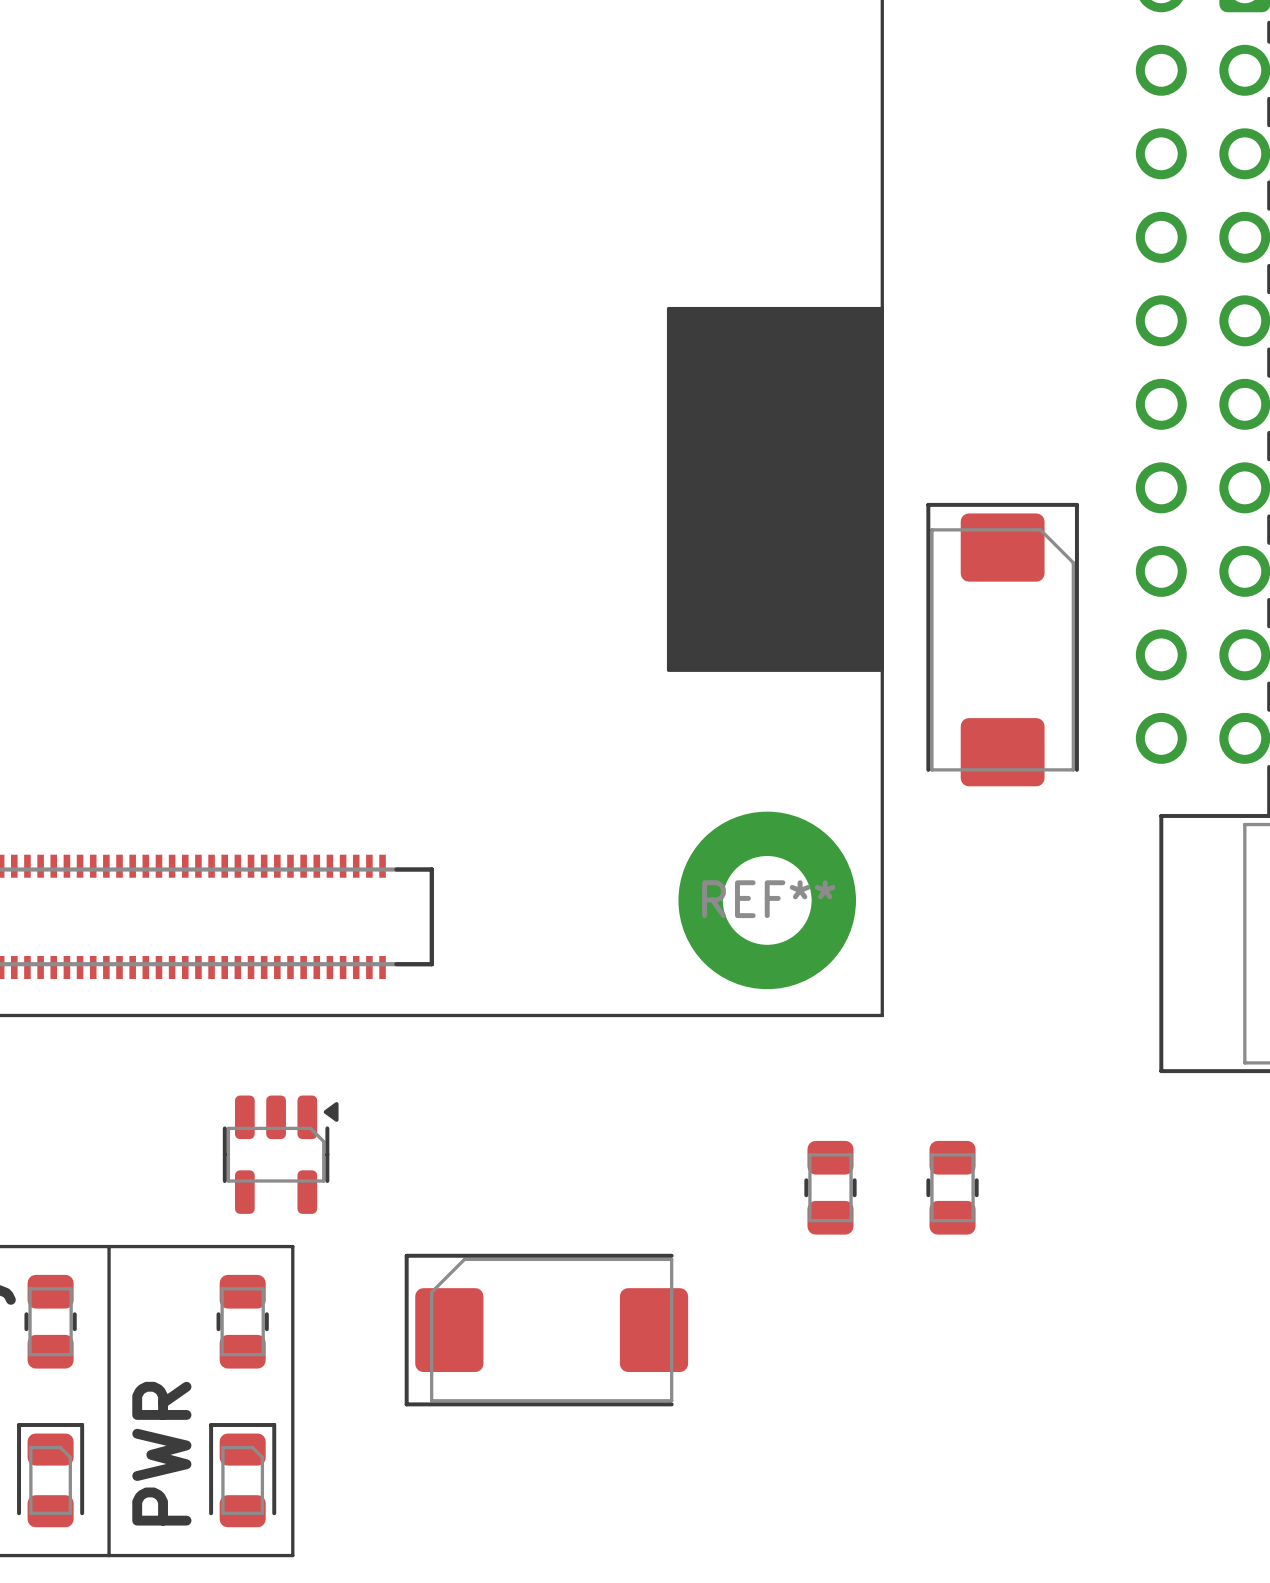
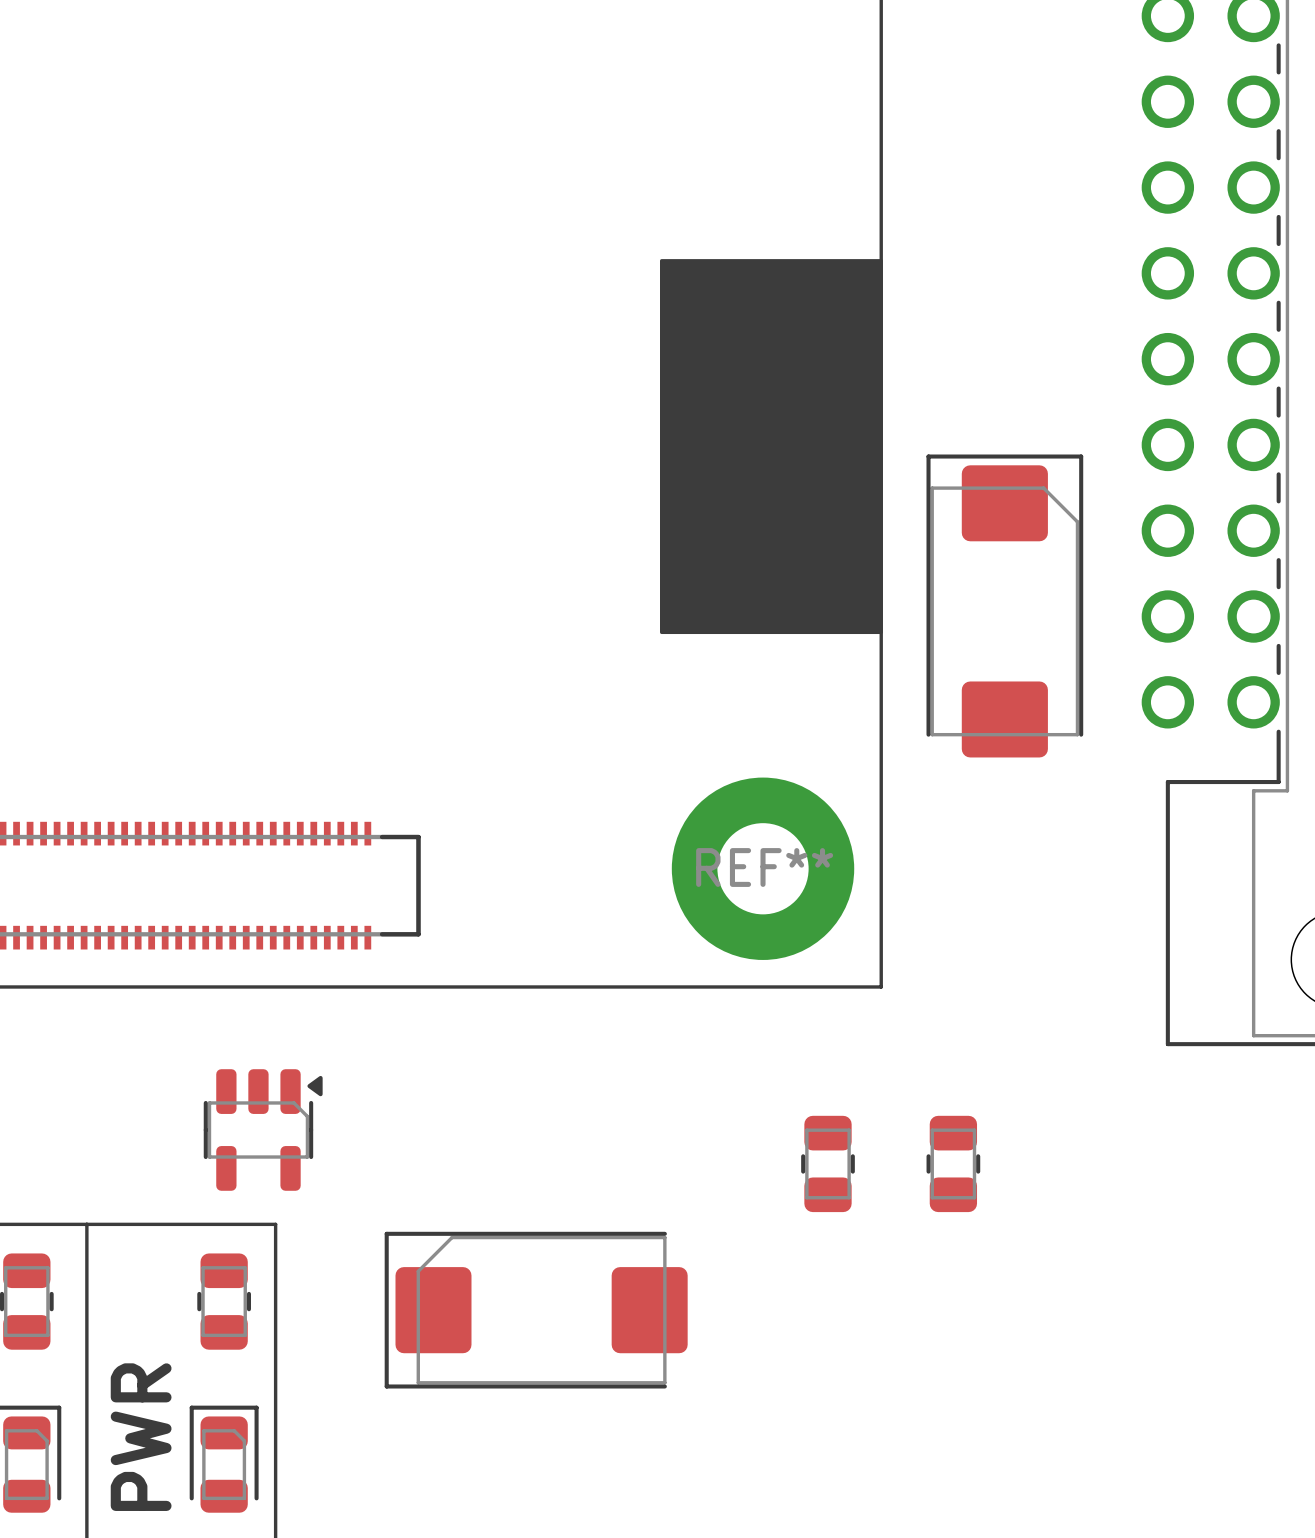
part footprint: [926, 502, 1079, 787] -> [926, 454, 1084, 758]
part footprint: [404, 1253, 689, 1407] -> [384, 1231, 688, 1389]

